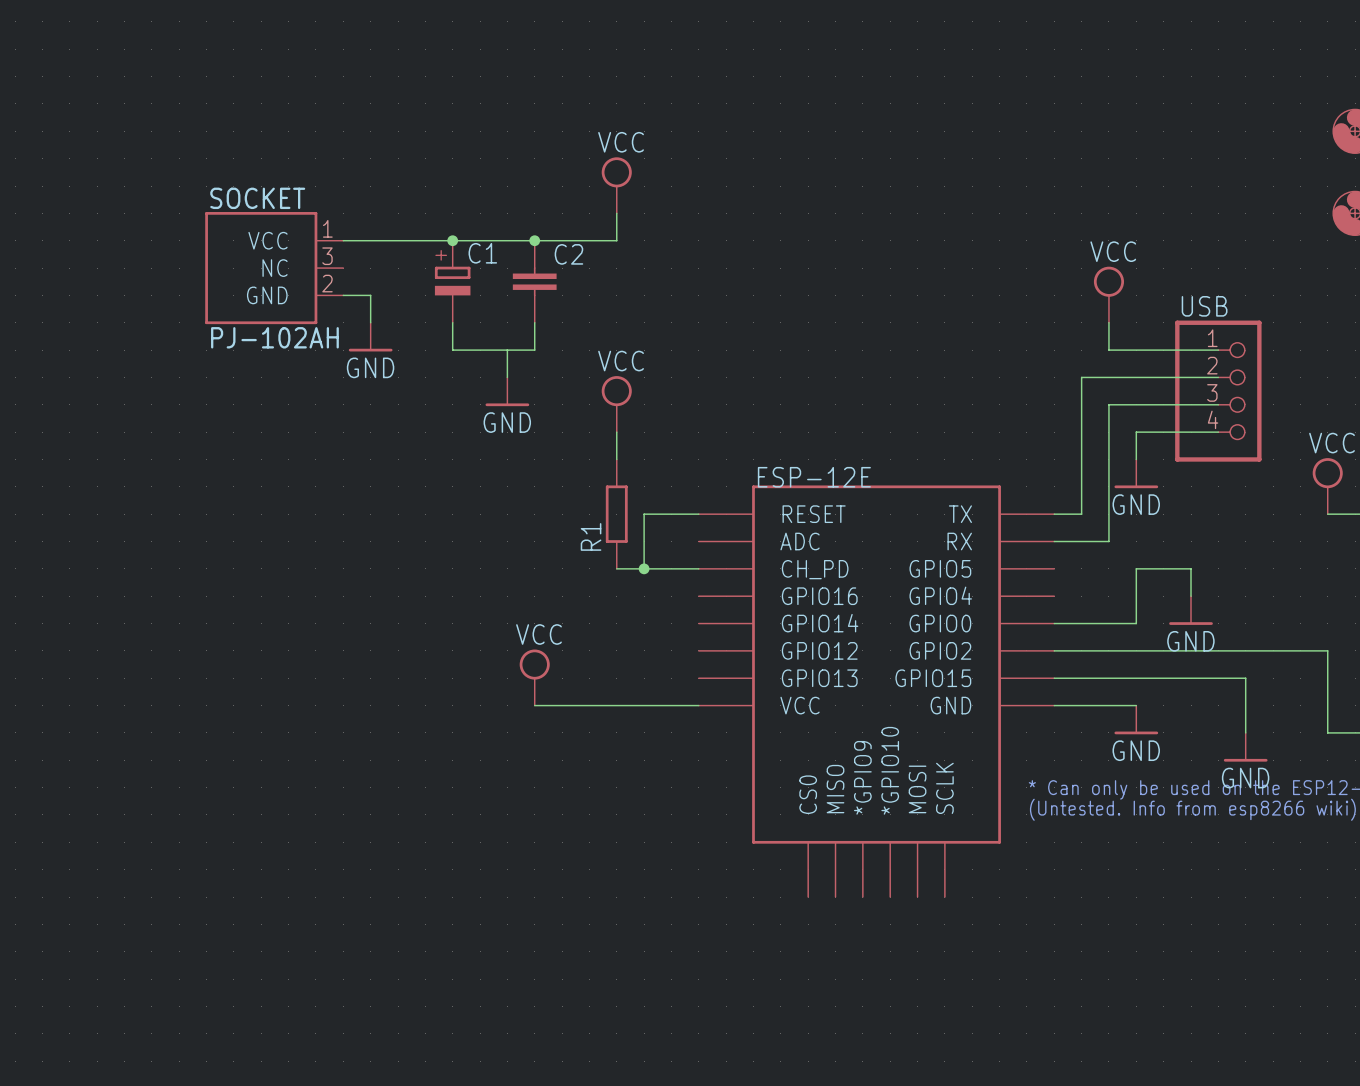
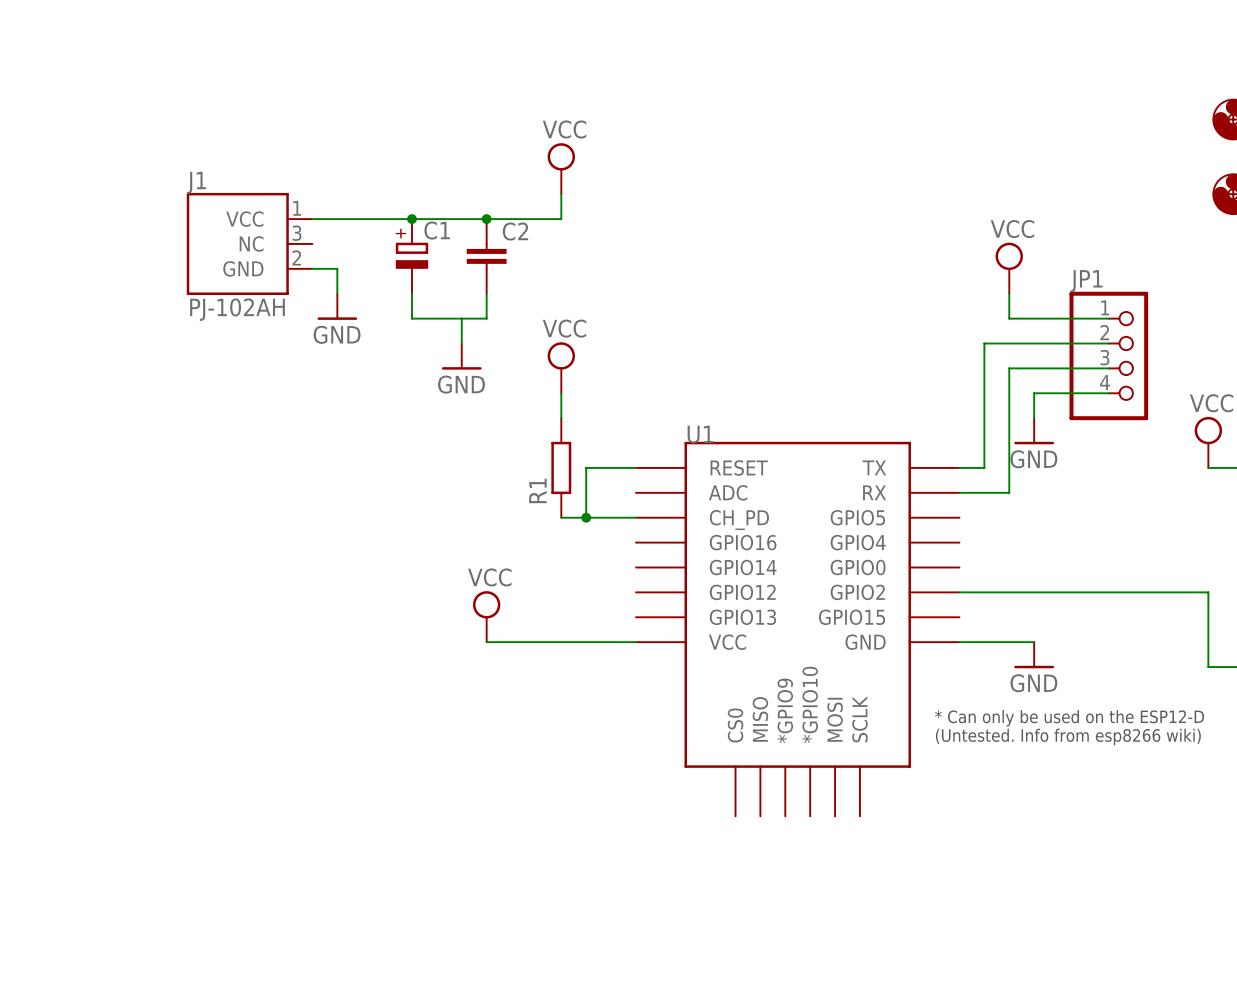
SOCKET name: SOCKET (257, 198) -> J1 (196, 182)
USB name: USB (1204, 306) -> JP1 (1086, 281)
ESP-12E name: ESP-12E (814, 477) -> U1 (700, 434)
wire: (1191, 596) (1191, 568) (1136, 568) (1136, 623) (1054, 623) -> none
power symbol: GND (1191, 610) -> none
wire: (1054, 678) (1245, 678) (1245, 732) -> none
power symbol: GND (1245, 747) -> none

